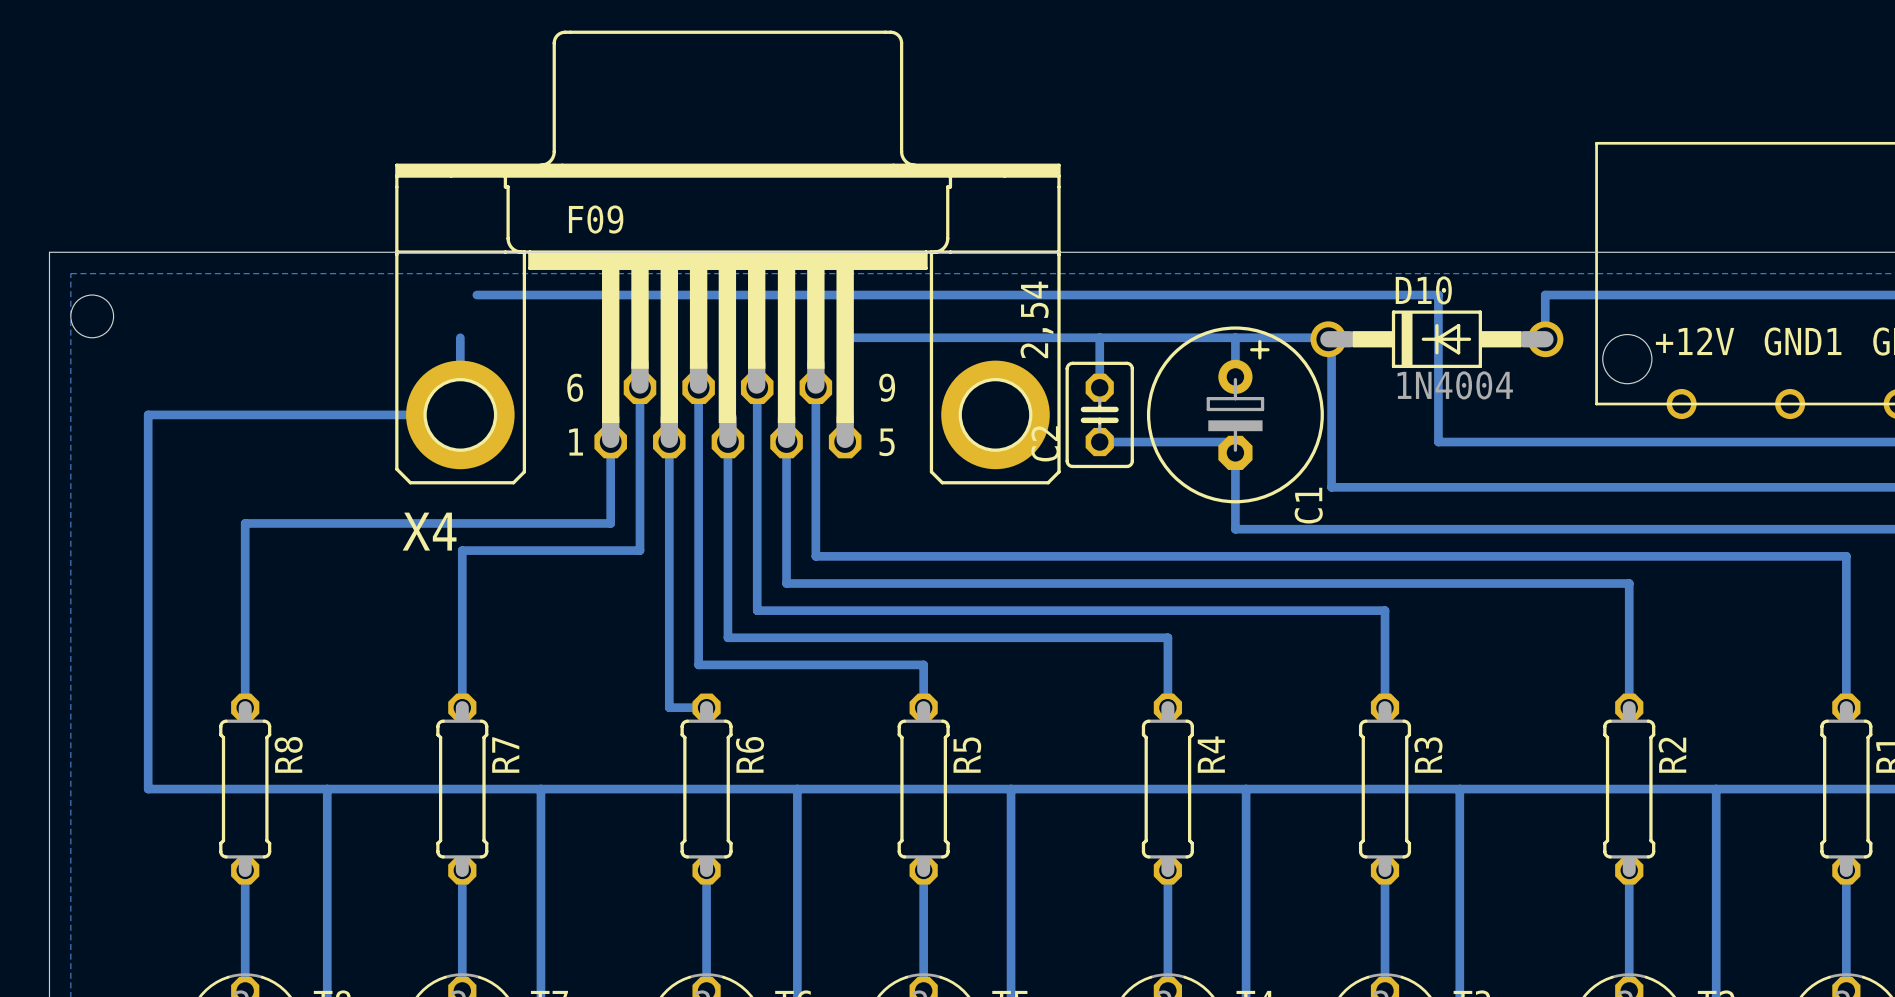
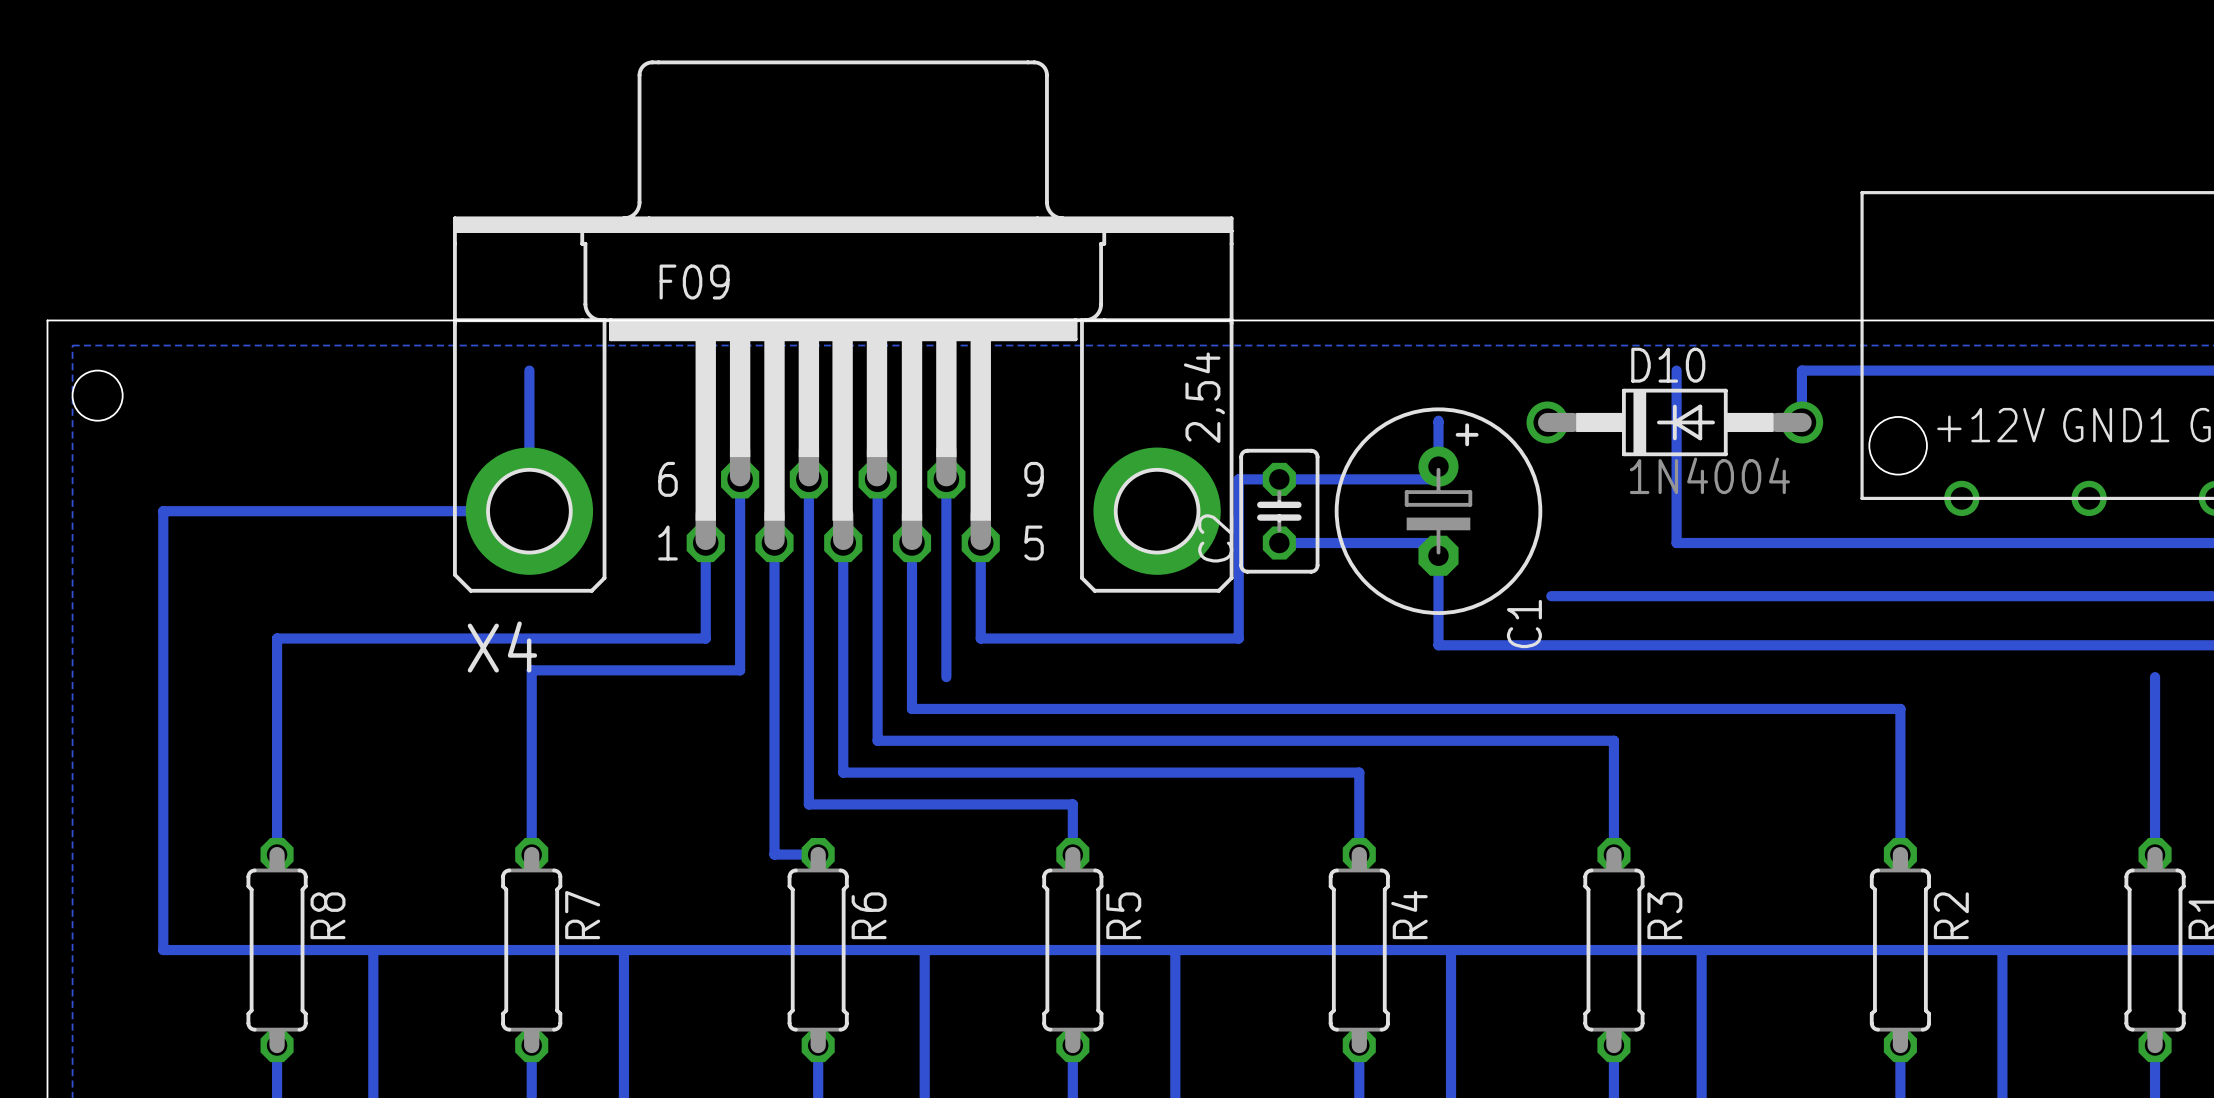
bottom track: none -> (529, 370) (529, 420)
bottom track: (476, 295) (1438, 295) -> none
bottom track: (1099, 337) (1099, 387) -> none
bottom track: (845, 442) (845, 337) (1331, 337) (1331, 487) -> (980, 543) (980, 638) (1238, 638) (1238, 479) (1438, 479) (1438, 466)
bottom track: (815, 556) (1846, 556) -> none

